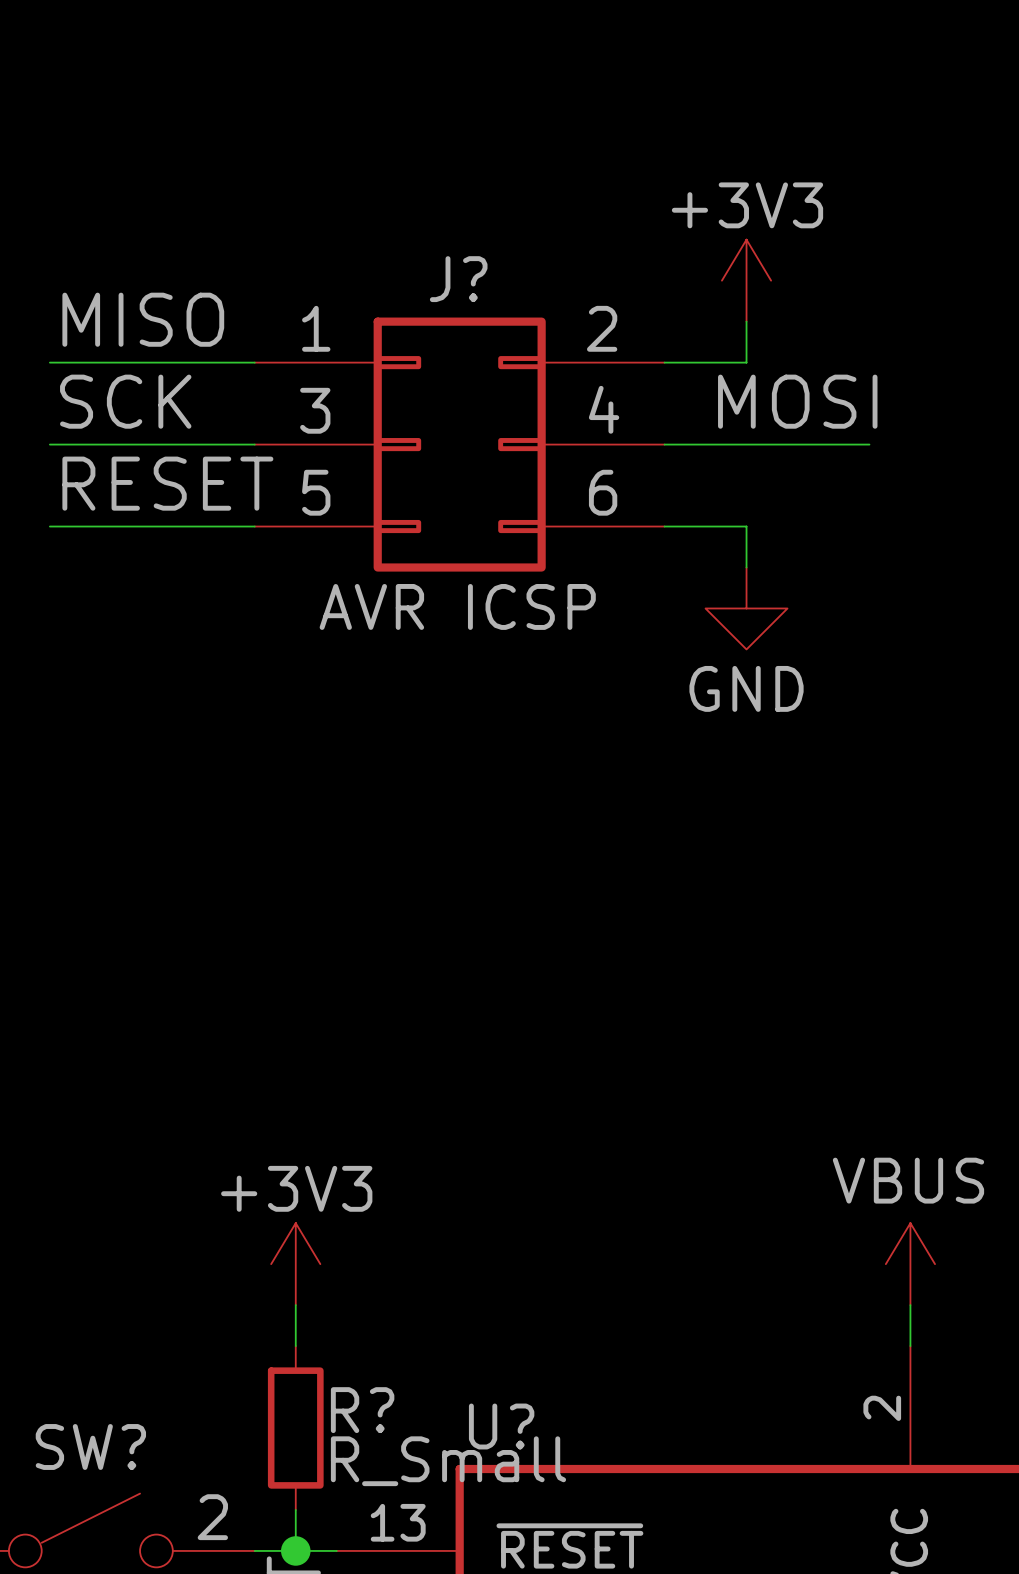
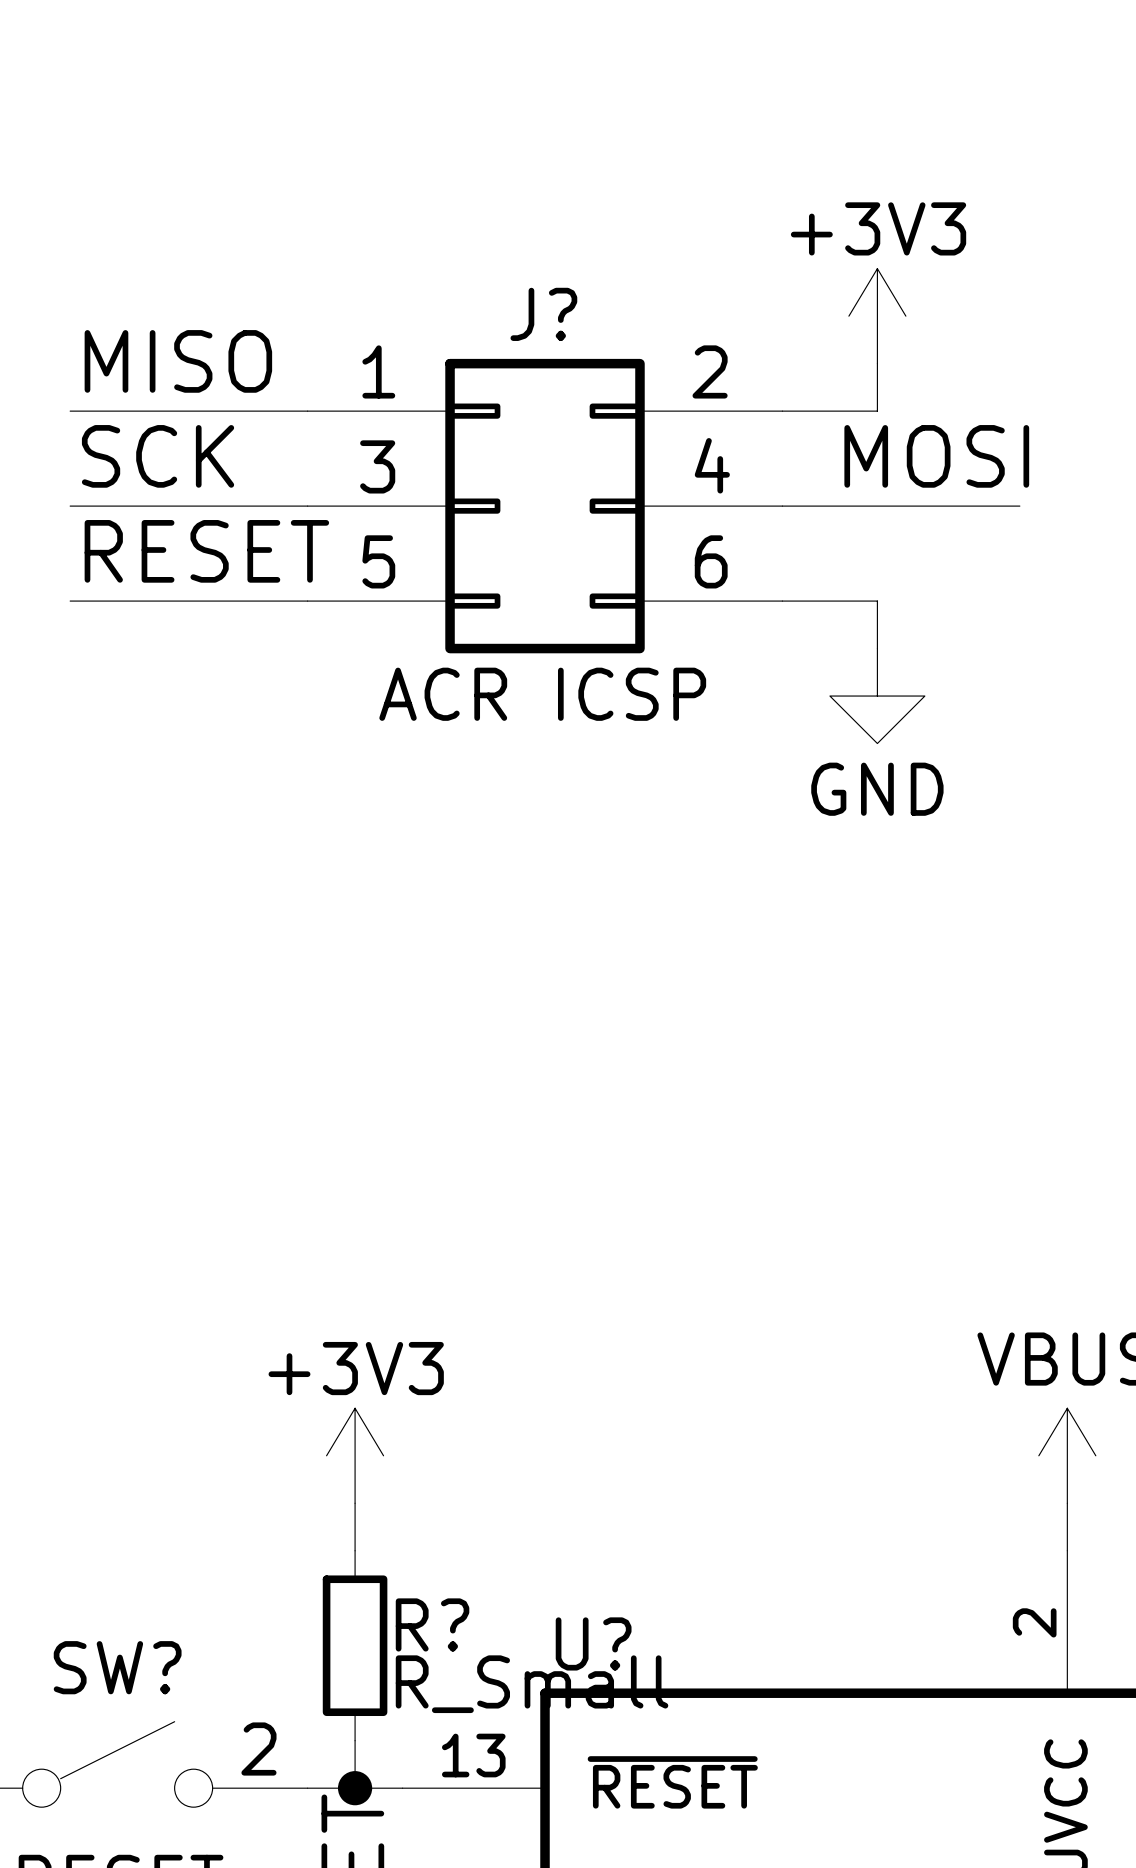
J? value: AVR ICSP (457, 606) -> ACR ICSP (542, 694)

